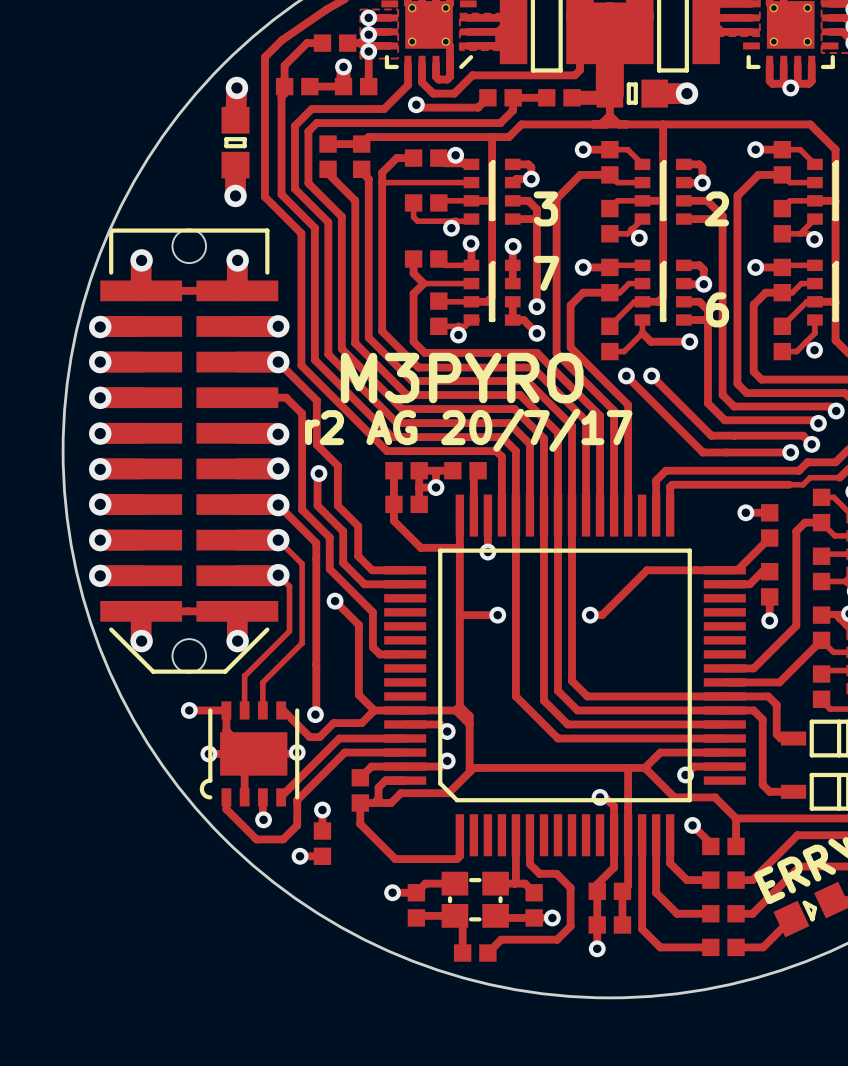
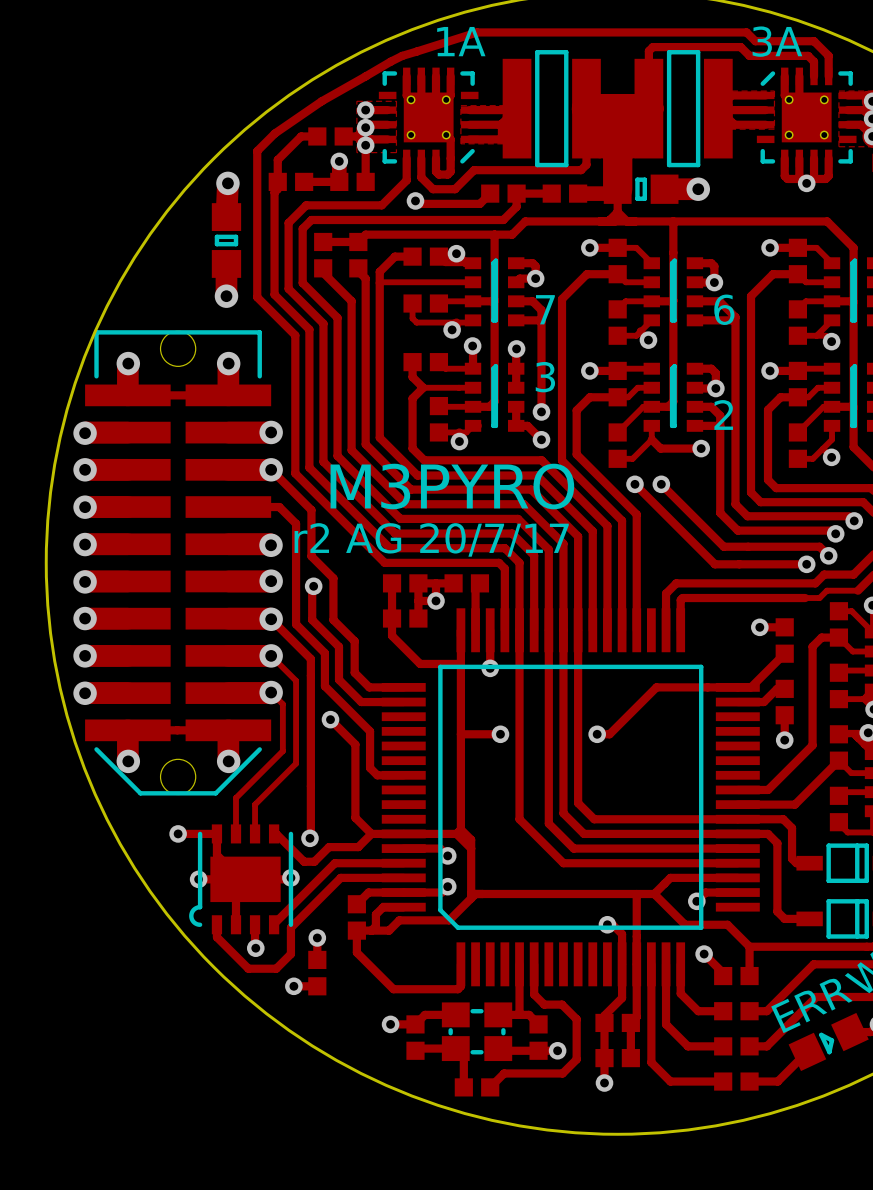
text: 3 (545, 208) -> 7 (545, 309)
text: 2 (716, 208) -> 6 (724, 309)
text: 7 (546, 273) -> 3 (545, 377)
text: 6 (717, 309) -> 2 (723, 414)

